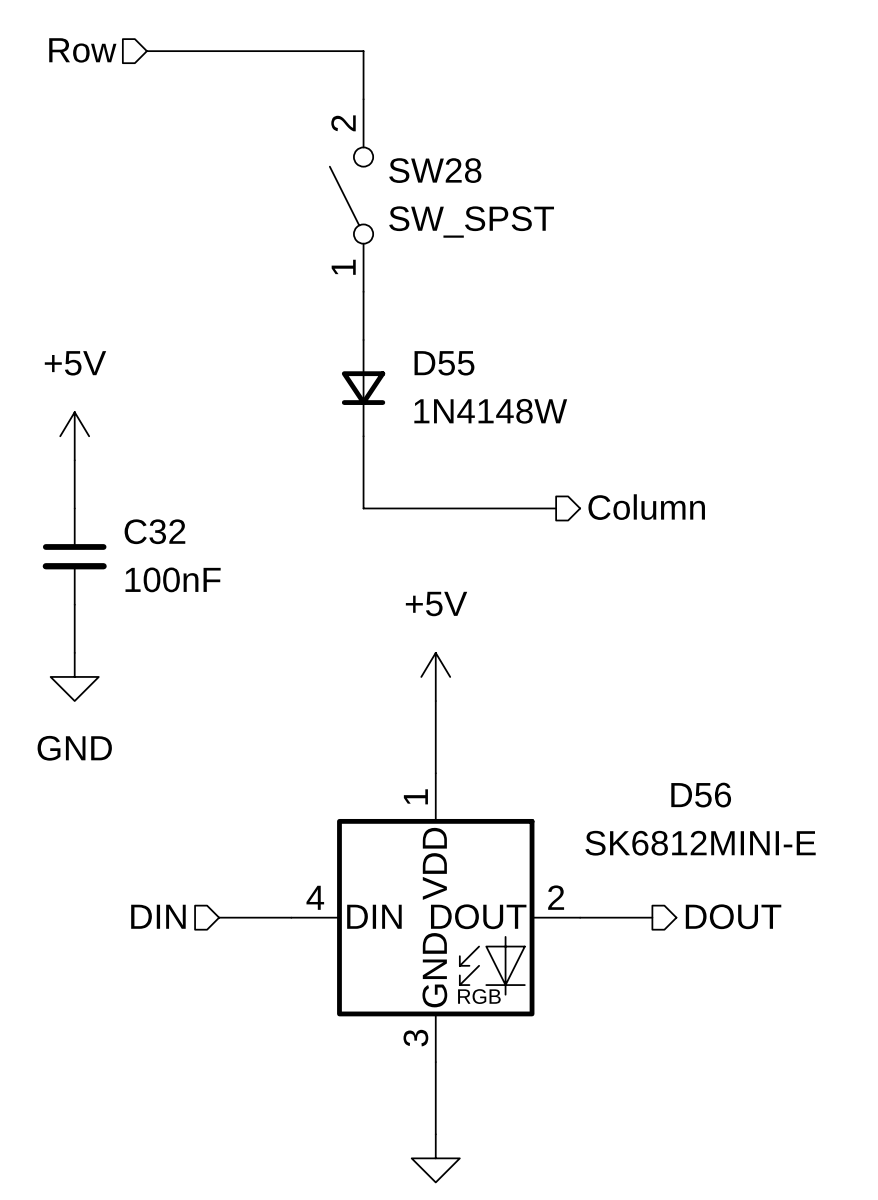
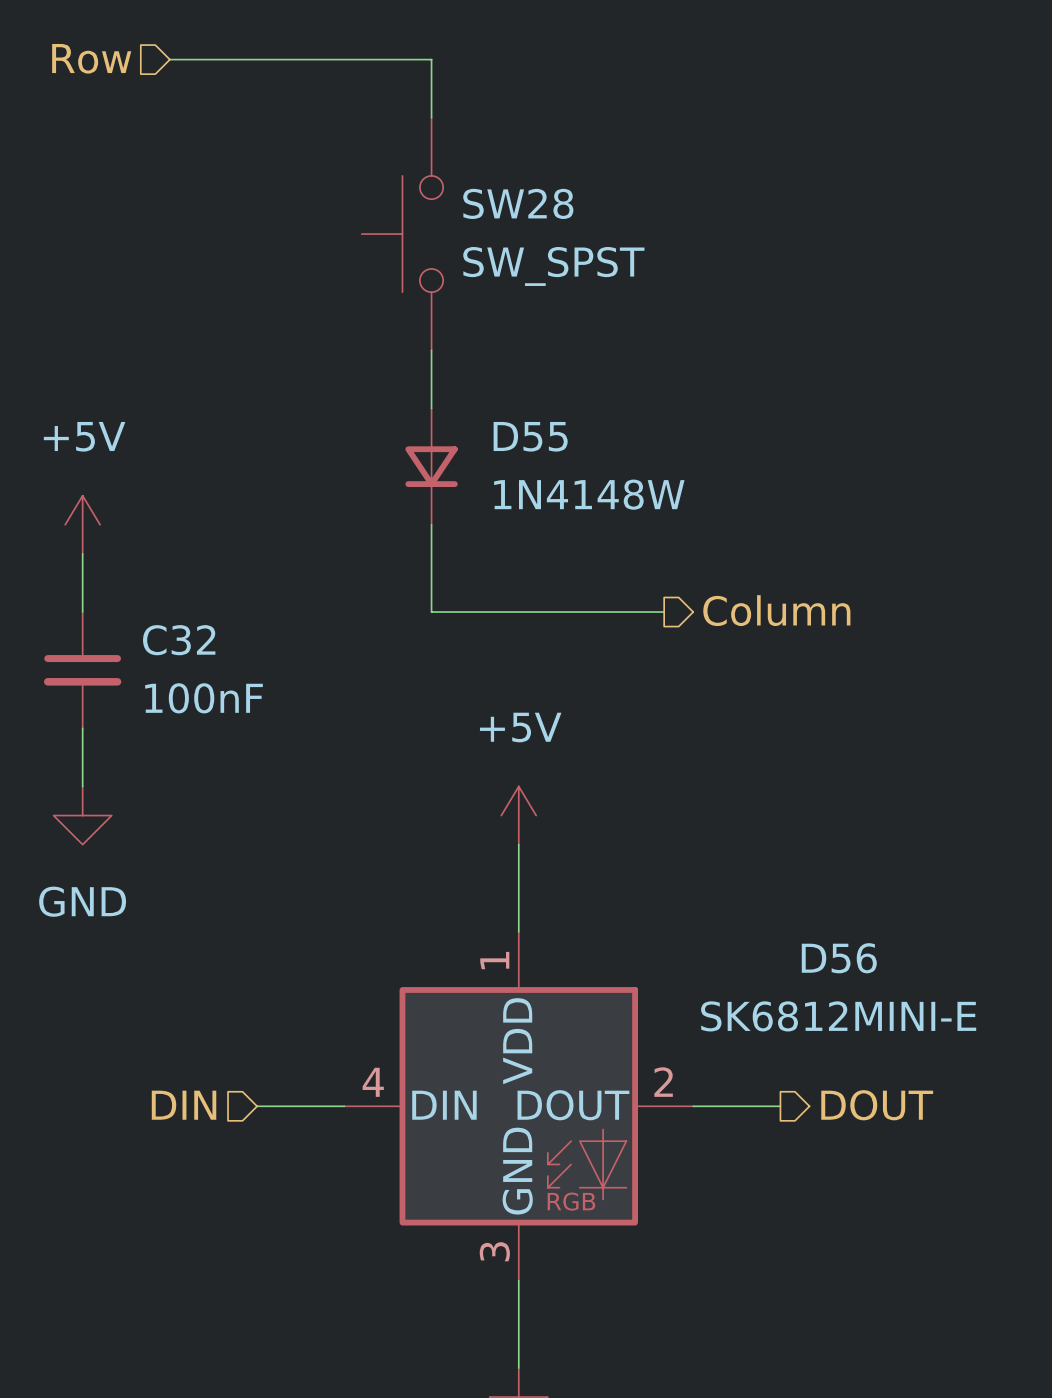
SW28 symbol: [329, 99, 374, 292] -> [361, 117, 444, 351]

